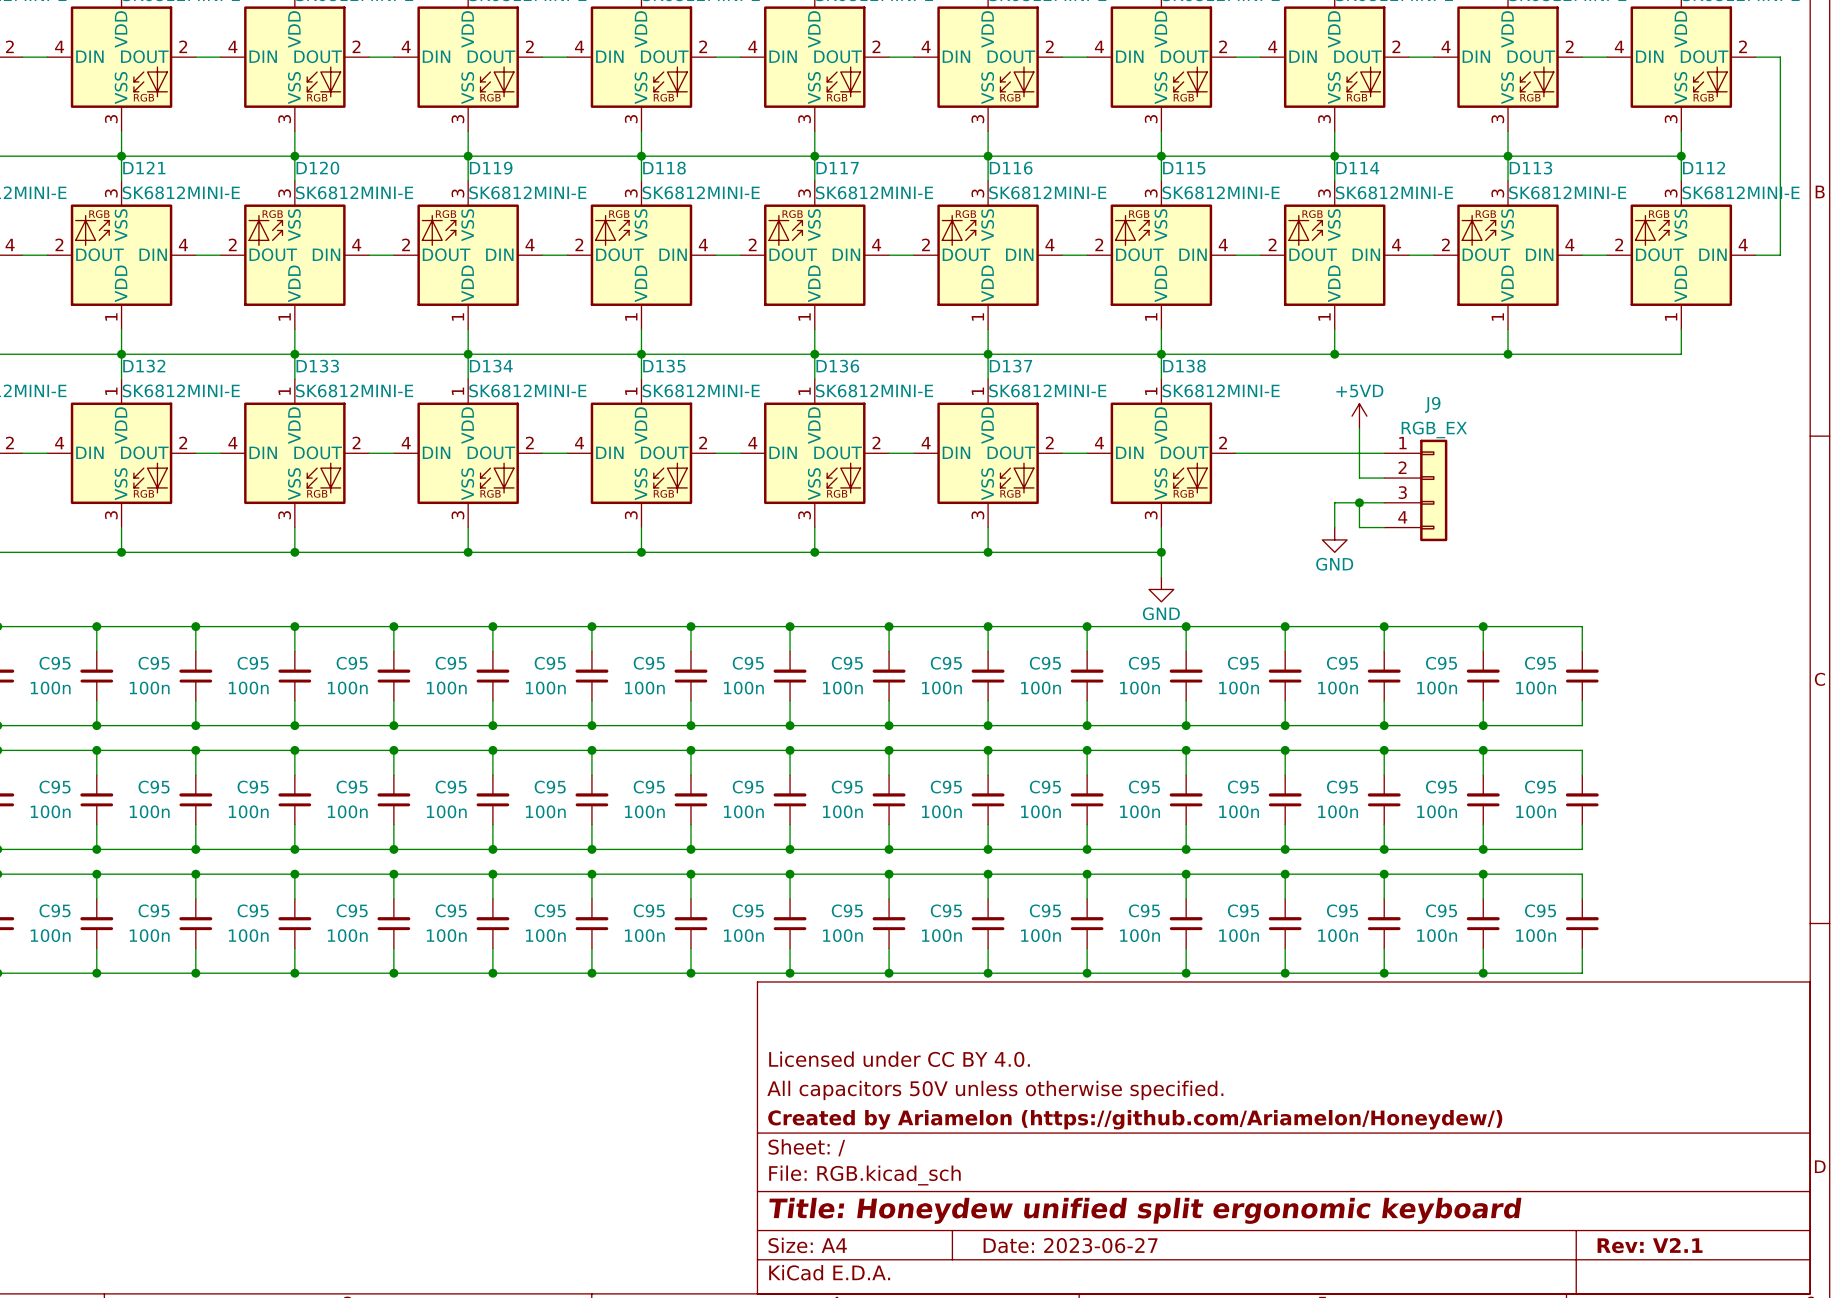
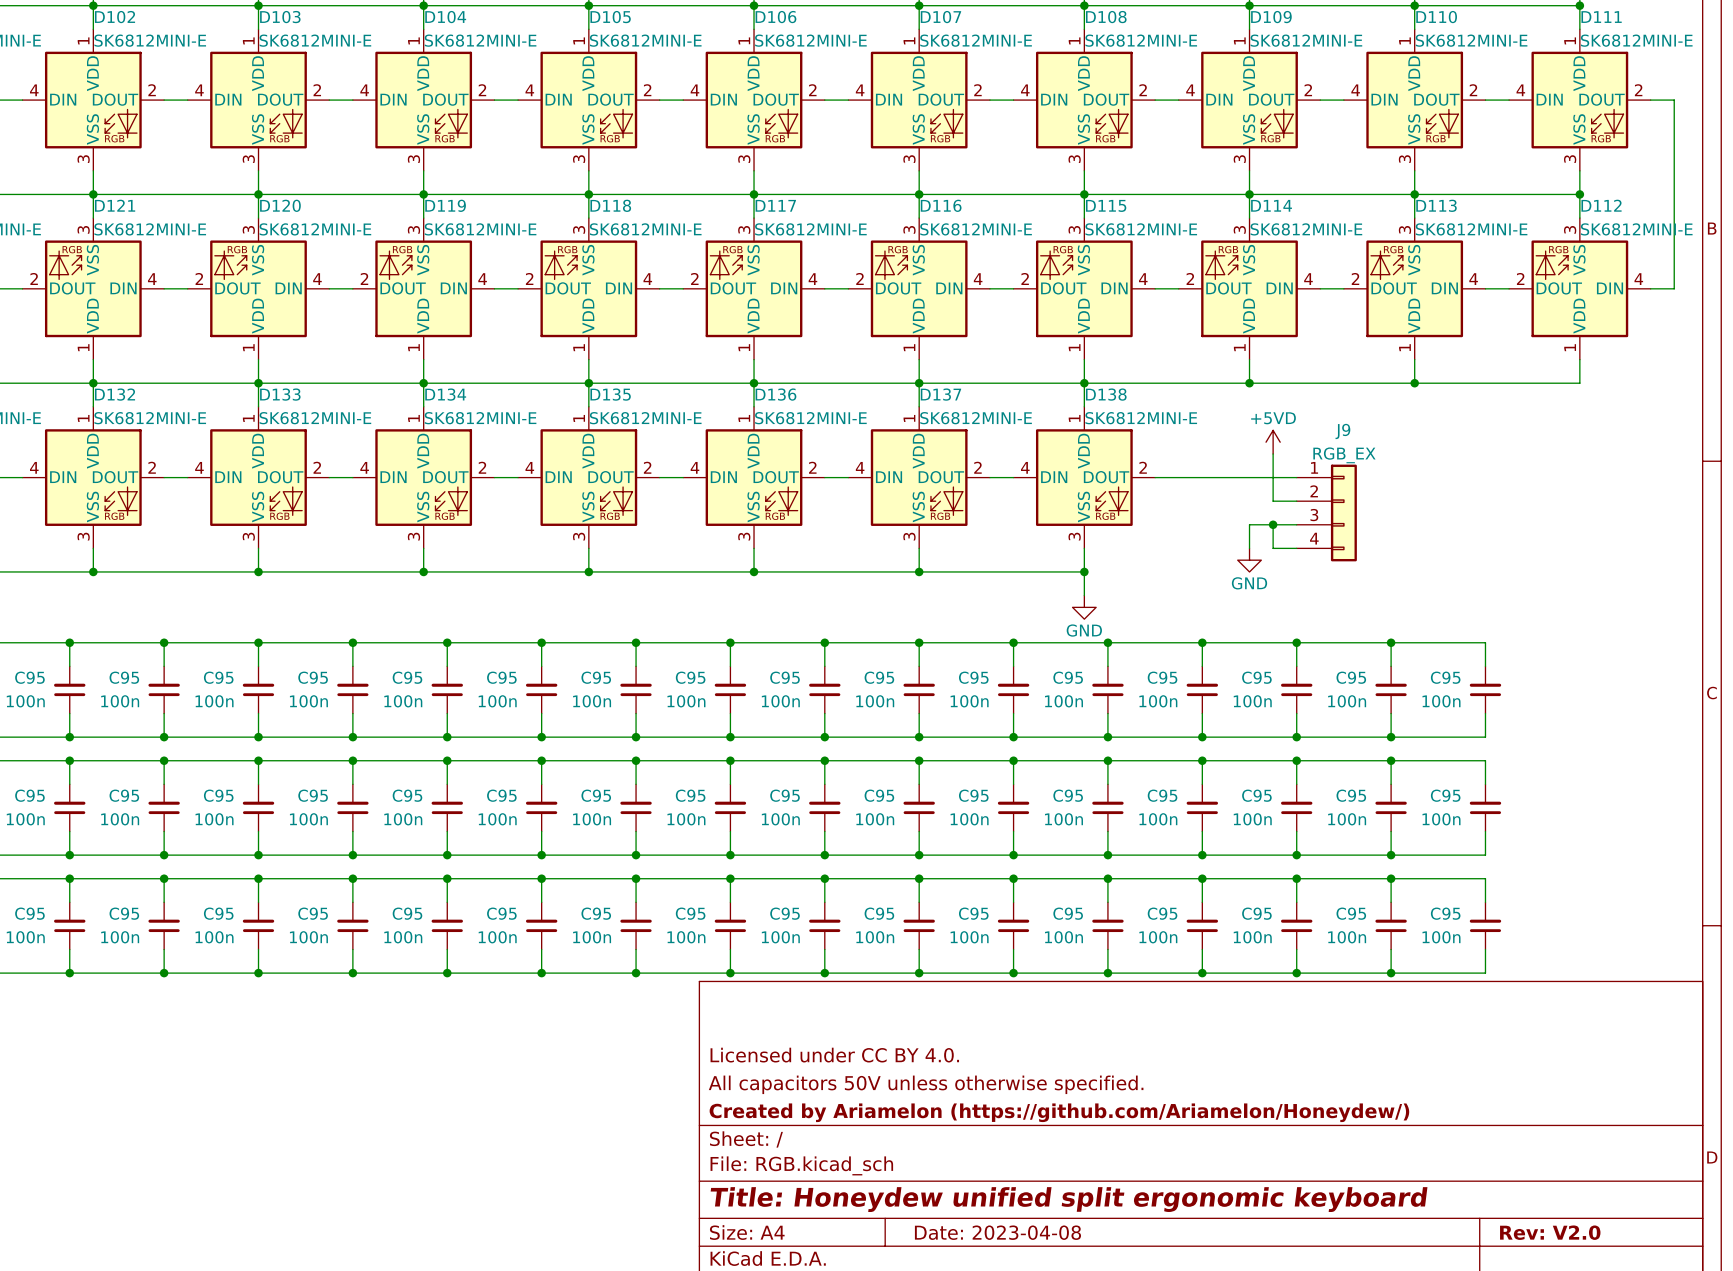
title block: Date: 2023-06-27 (1070, 1245) -> Date: 2023-04-08 (997, 1232)
title block: Rev: V2.1 (1650, 1245) -> Rev: V2.0 (1550, 1232)

